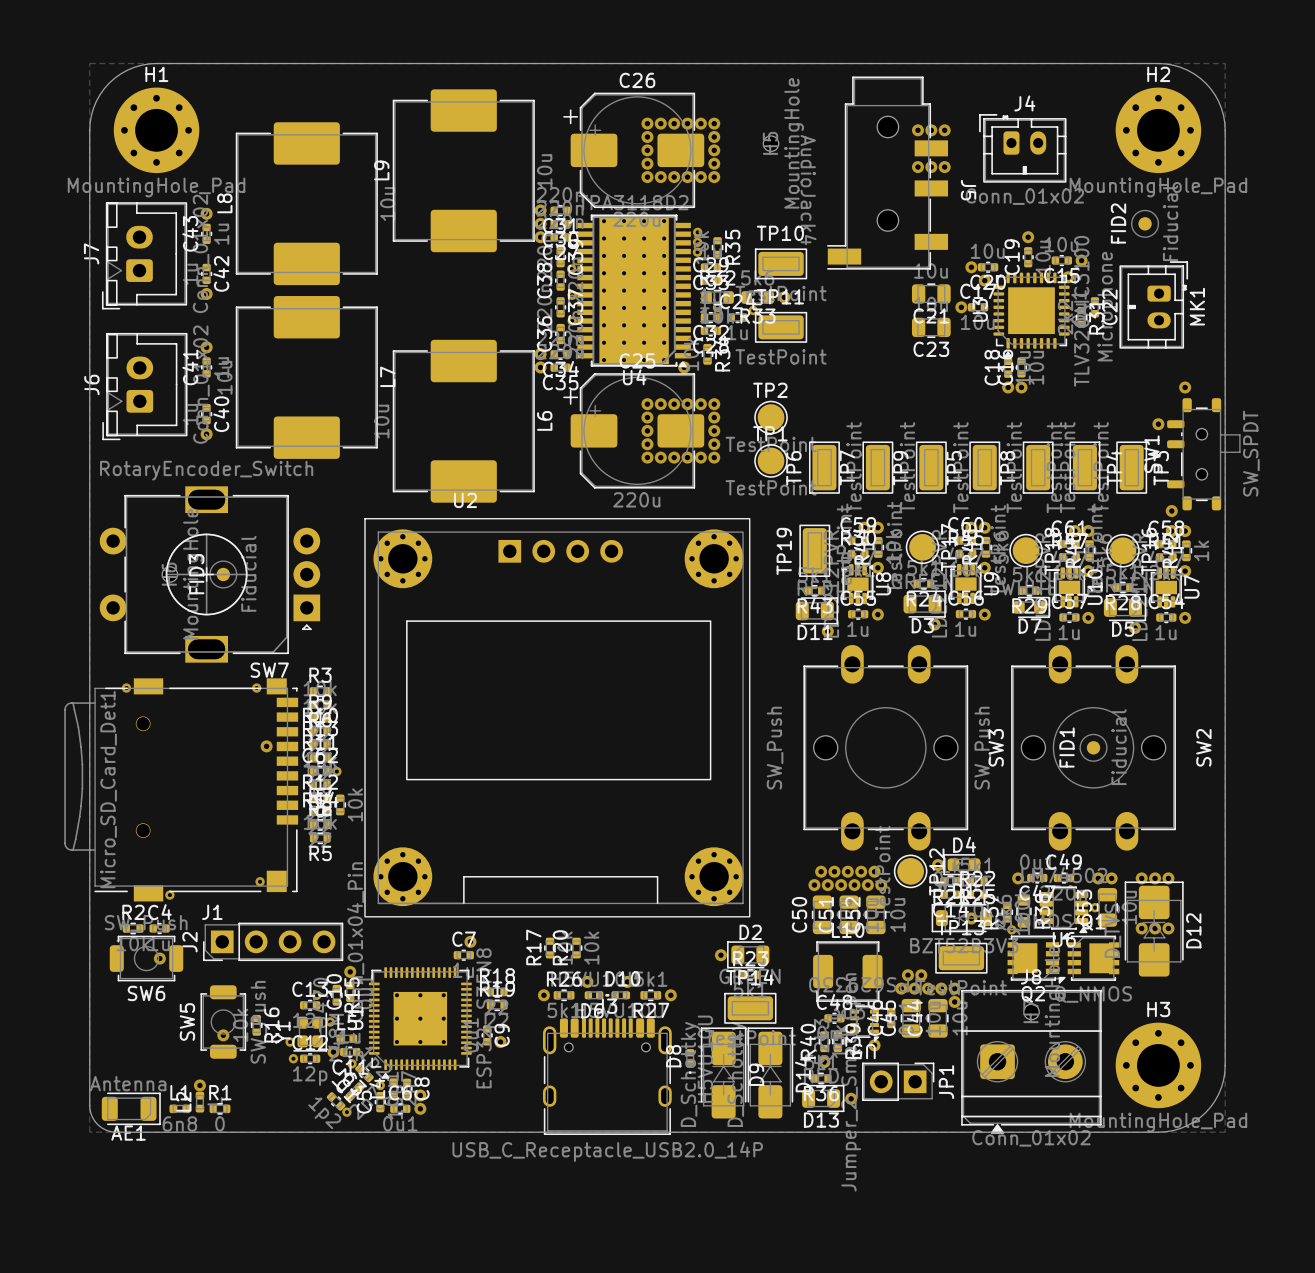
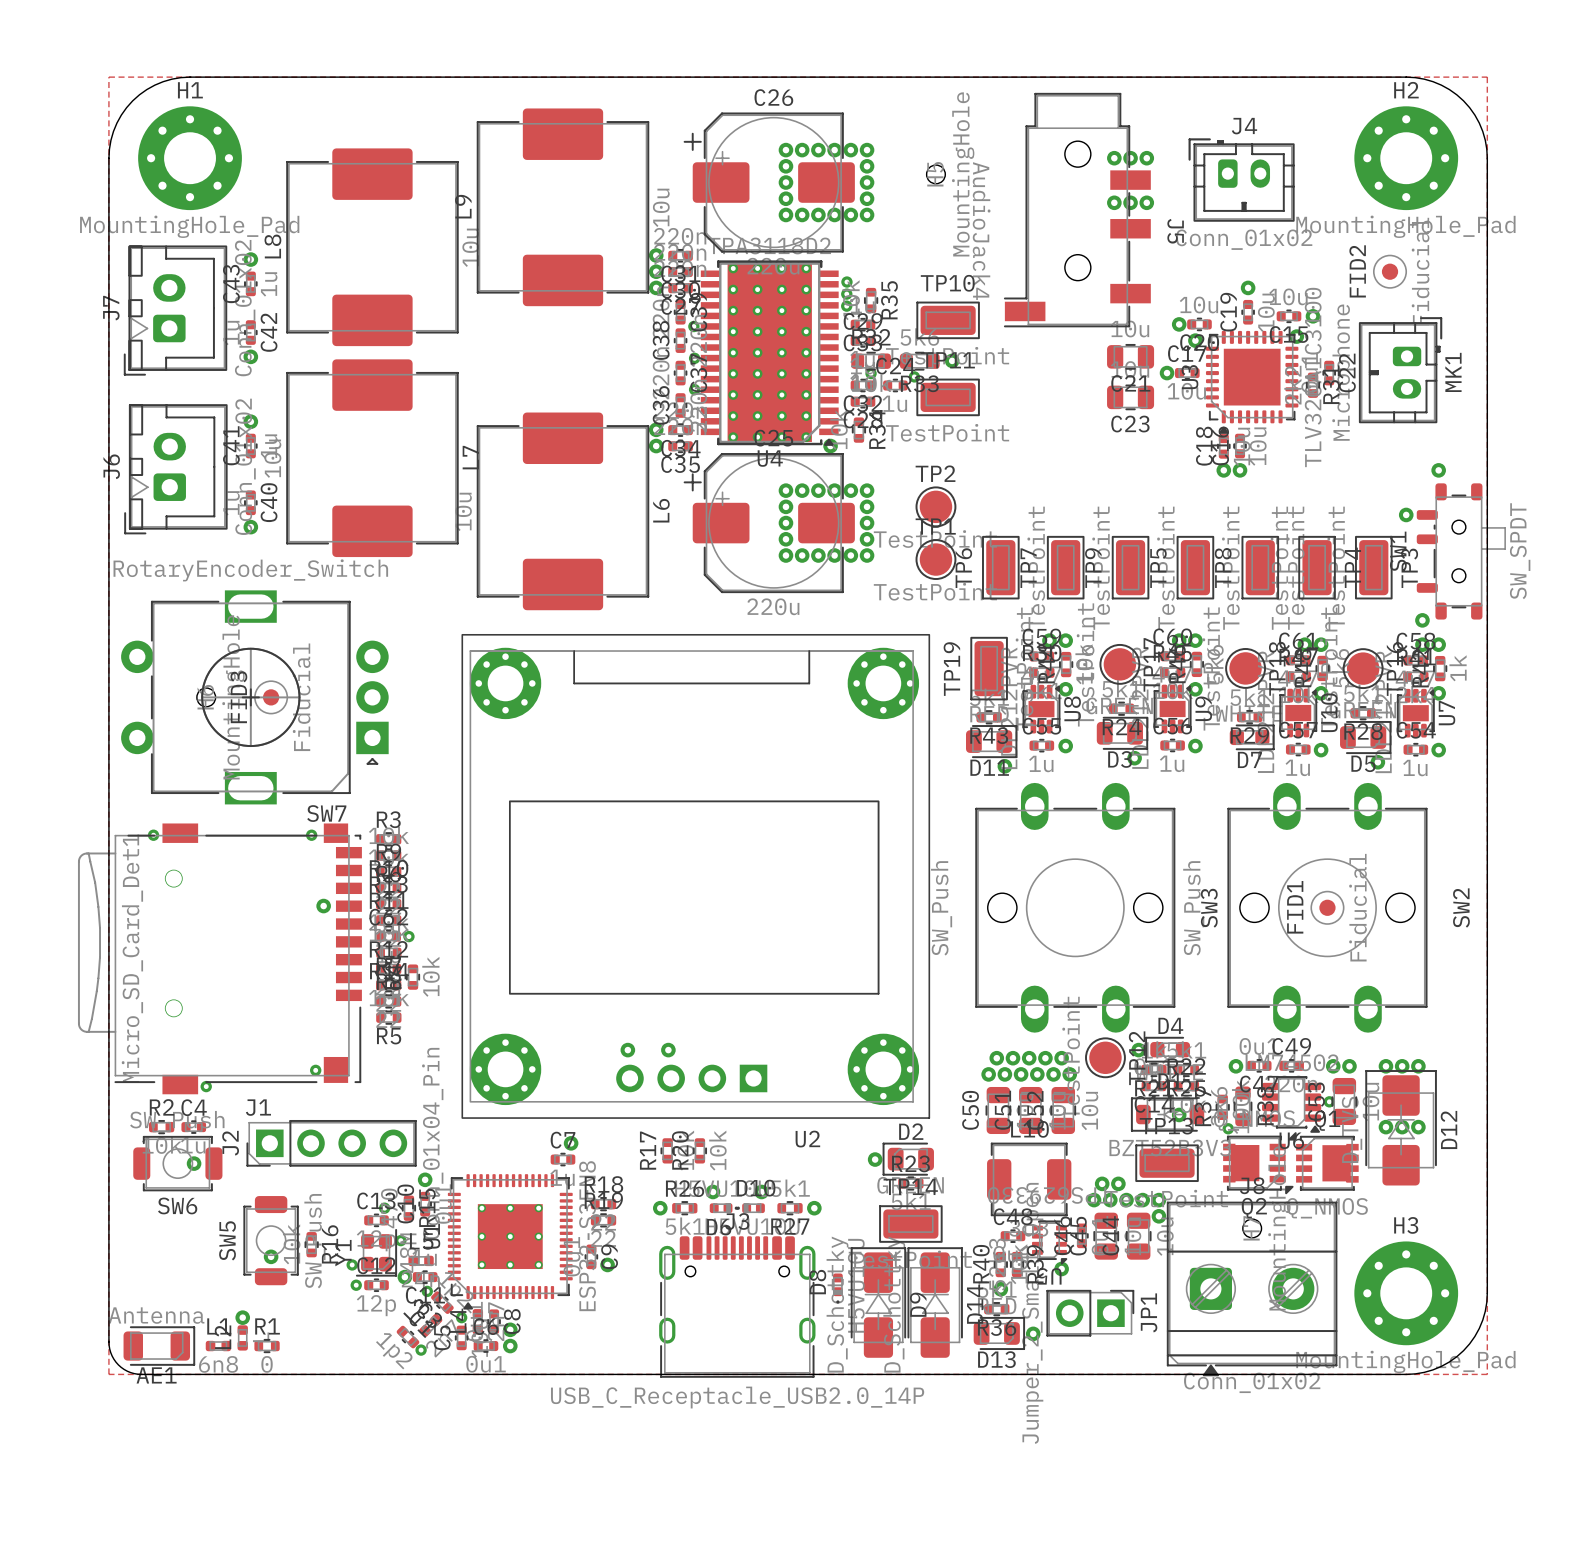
U2 rotation: 0° (557, 717) -> 180° (695, 876)
via: none -> (627, 1050)
via: none -> (668, 1050)

